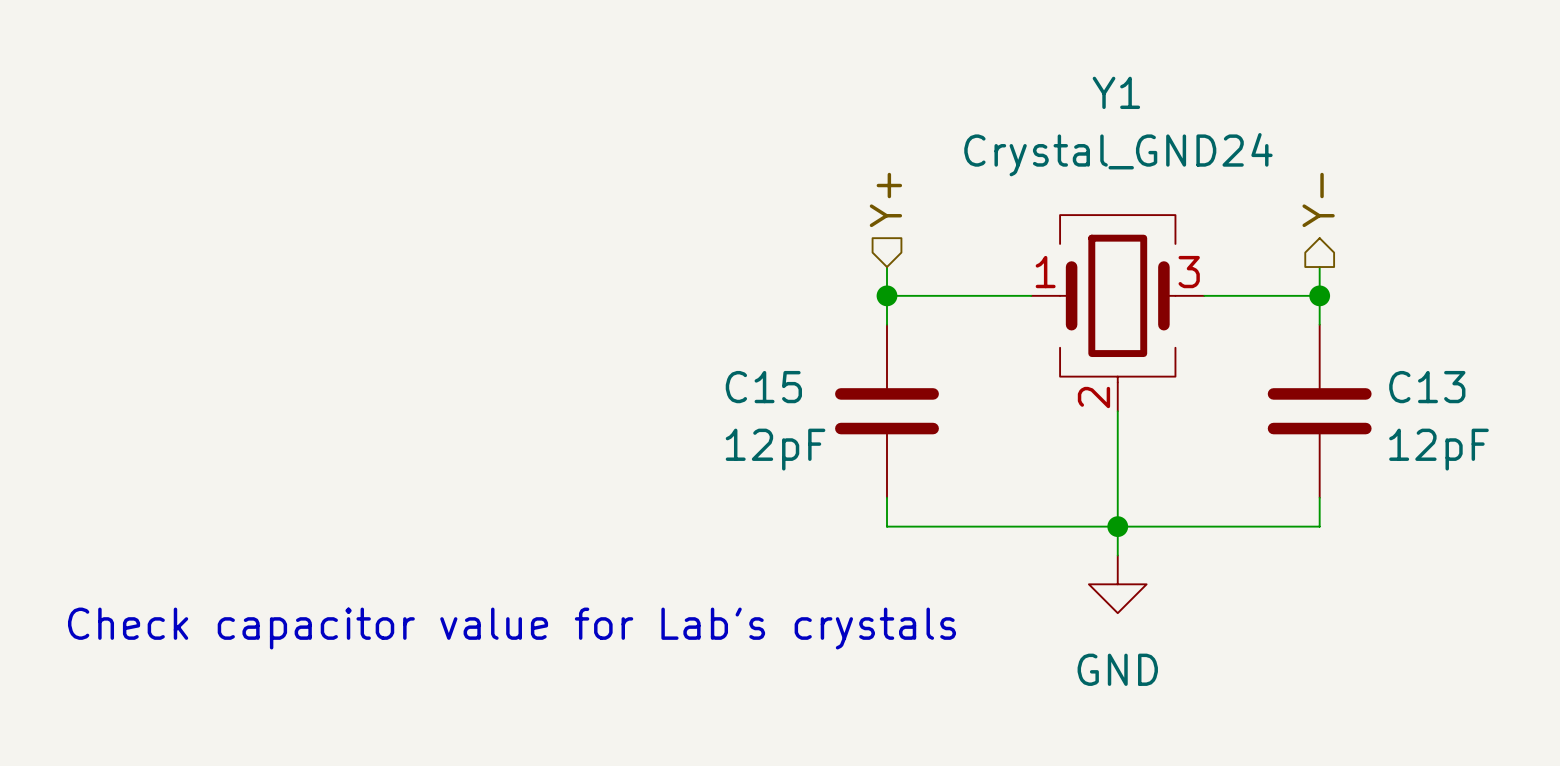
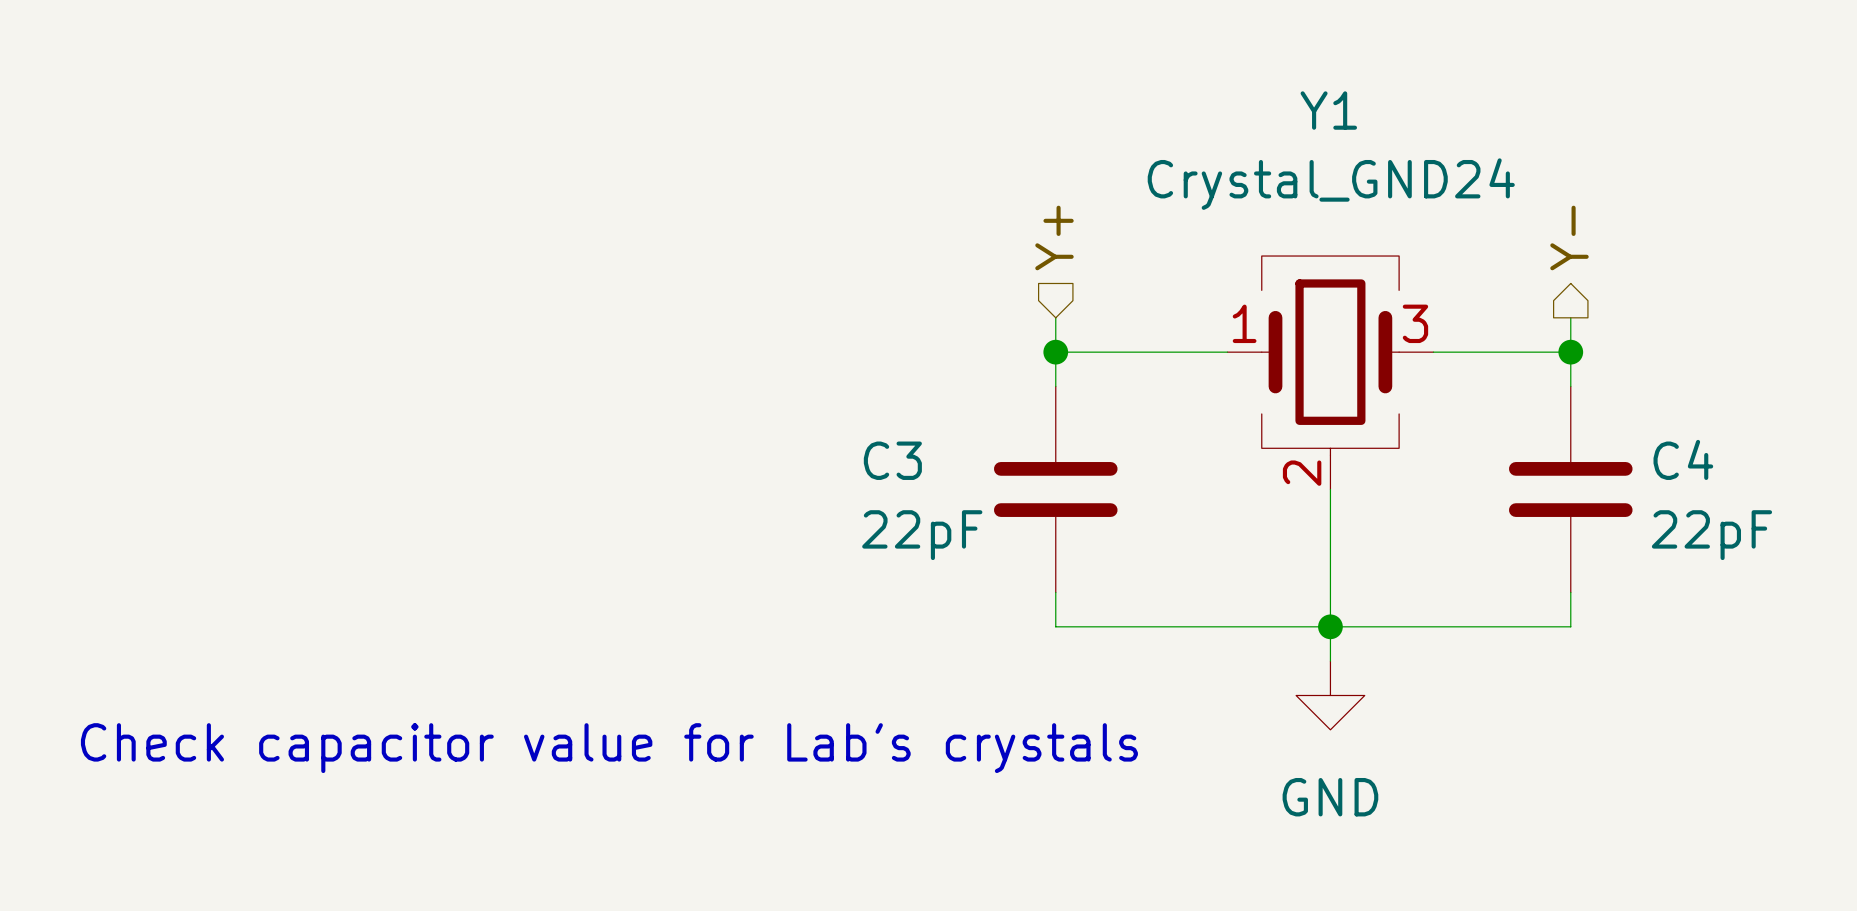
C15 name: C15 (763, 387) -> C3 (892, 460)
C13 name: C13 (1427, 387) -> C4 (1683, 459)
C15 value: 12pF (775, 449) -> 22pF (922, 535)
C13 value: 12pF (1438, 449) -> 22pF (1711, 535)

